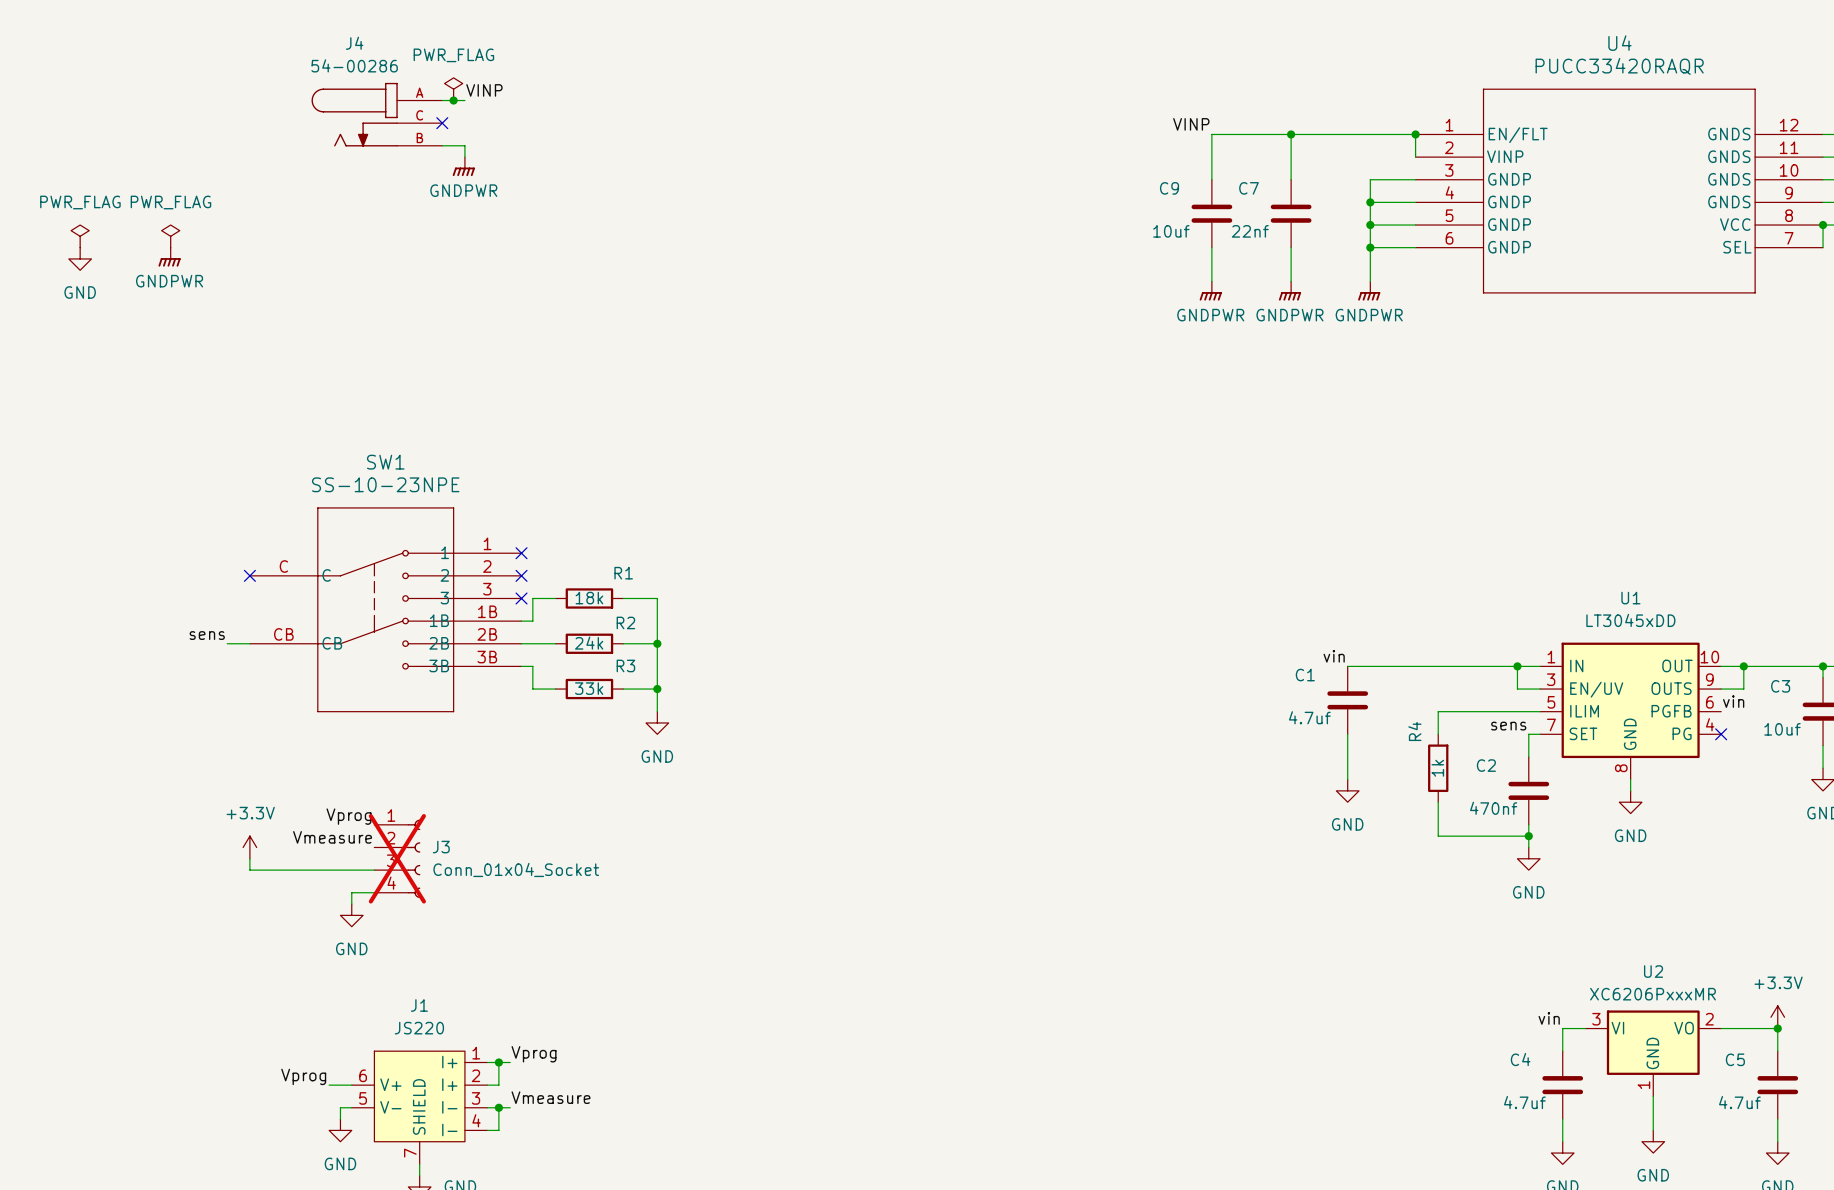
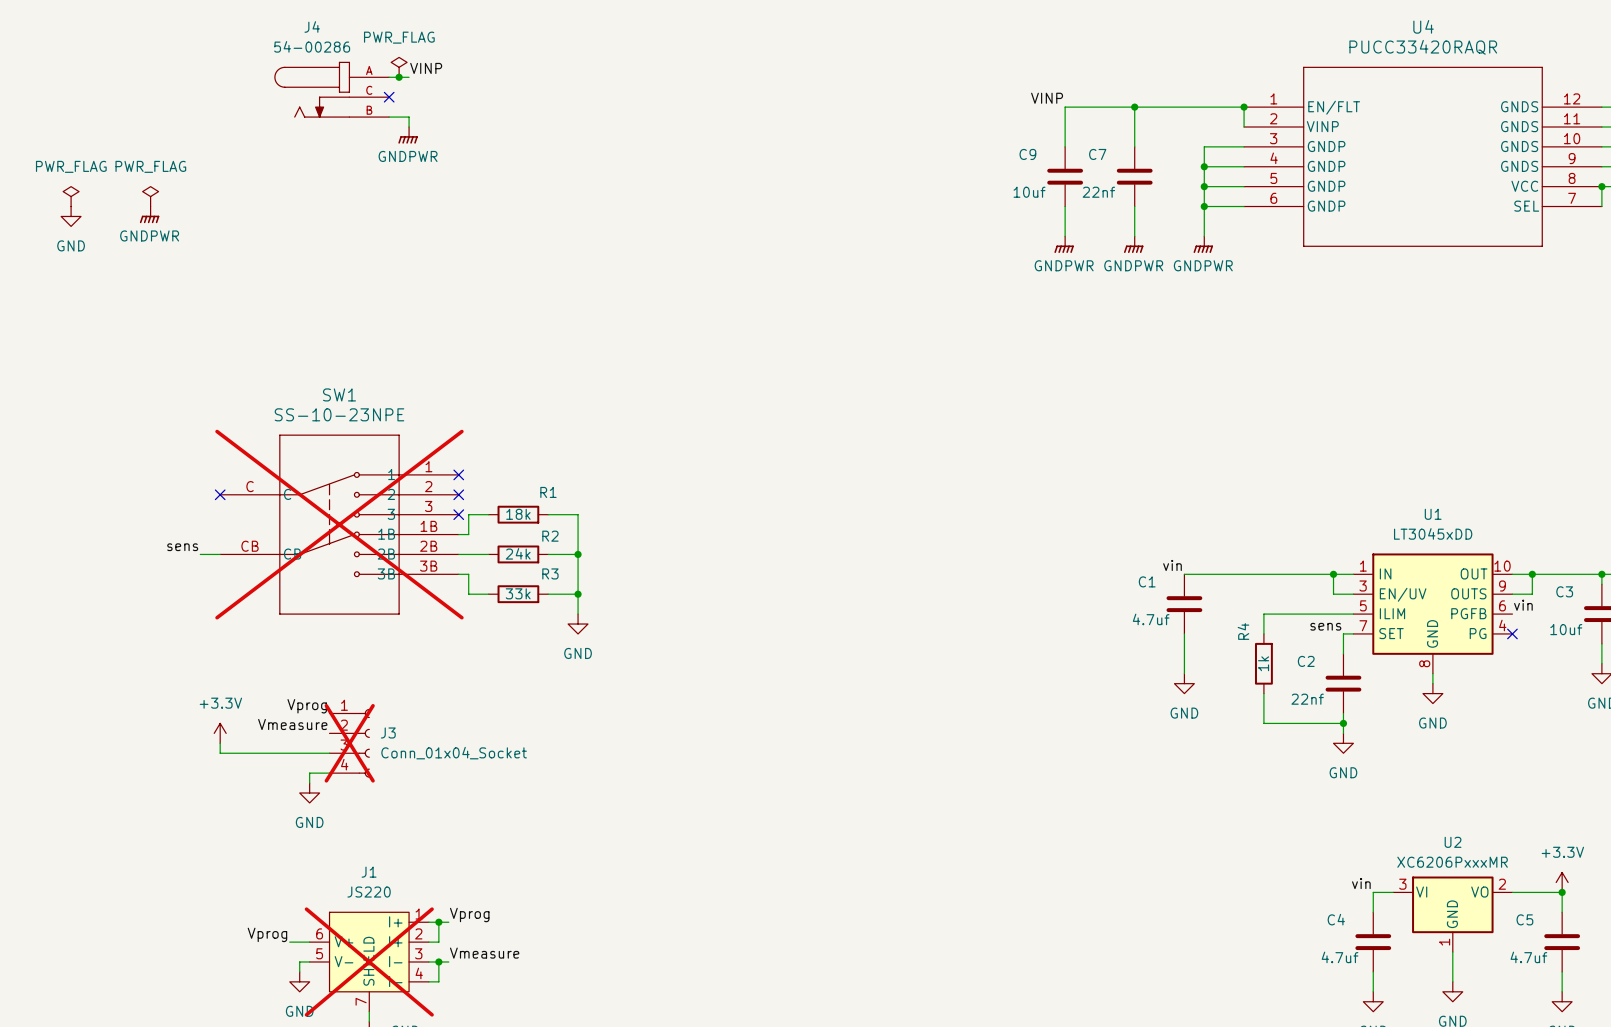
SW1 do-not-place cross: none -> (339, 524)
C2 value: 470nf (1493, 808) -> 22nf (1307, 699)
J1 do-not-place cross: none -> (369, 961)

